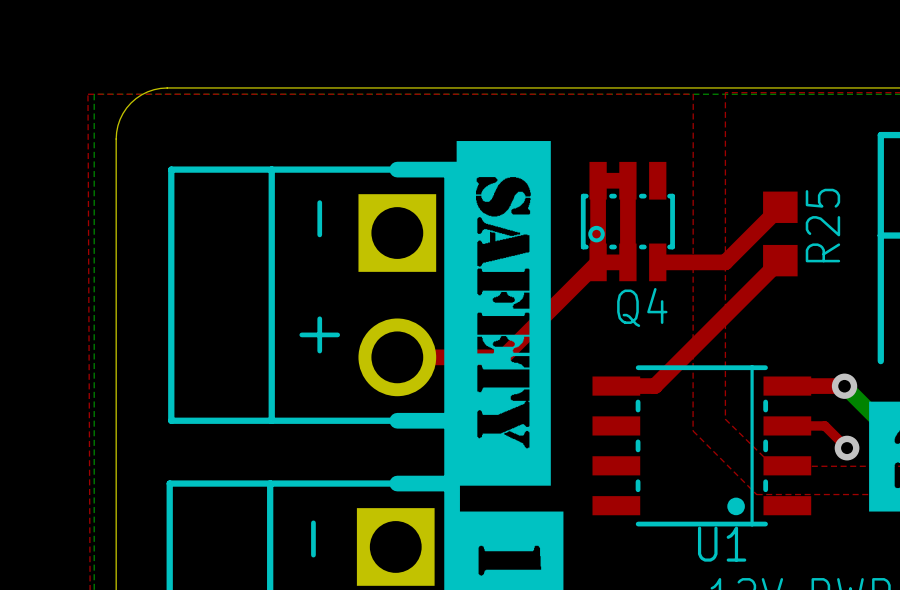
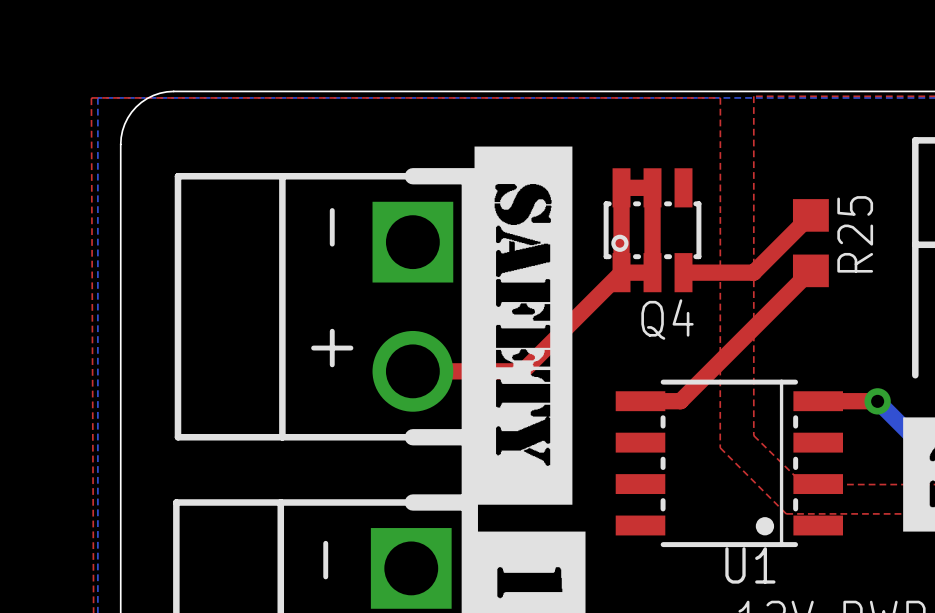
top track: (787, 425) (824, 425) (847, 448) -> none
via: (847, 448) -> none

